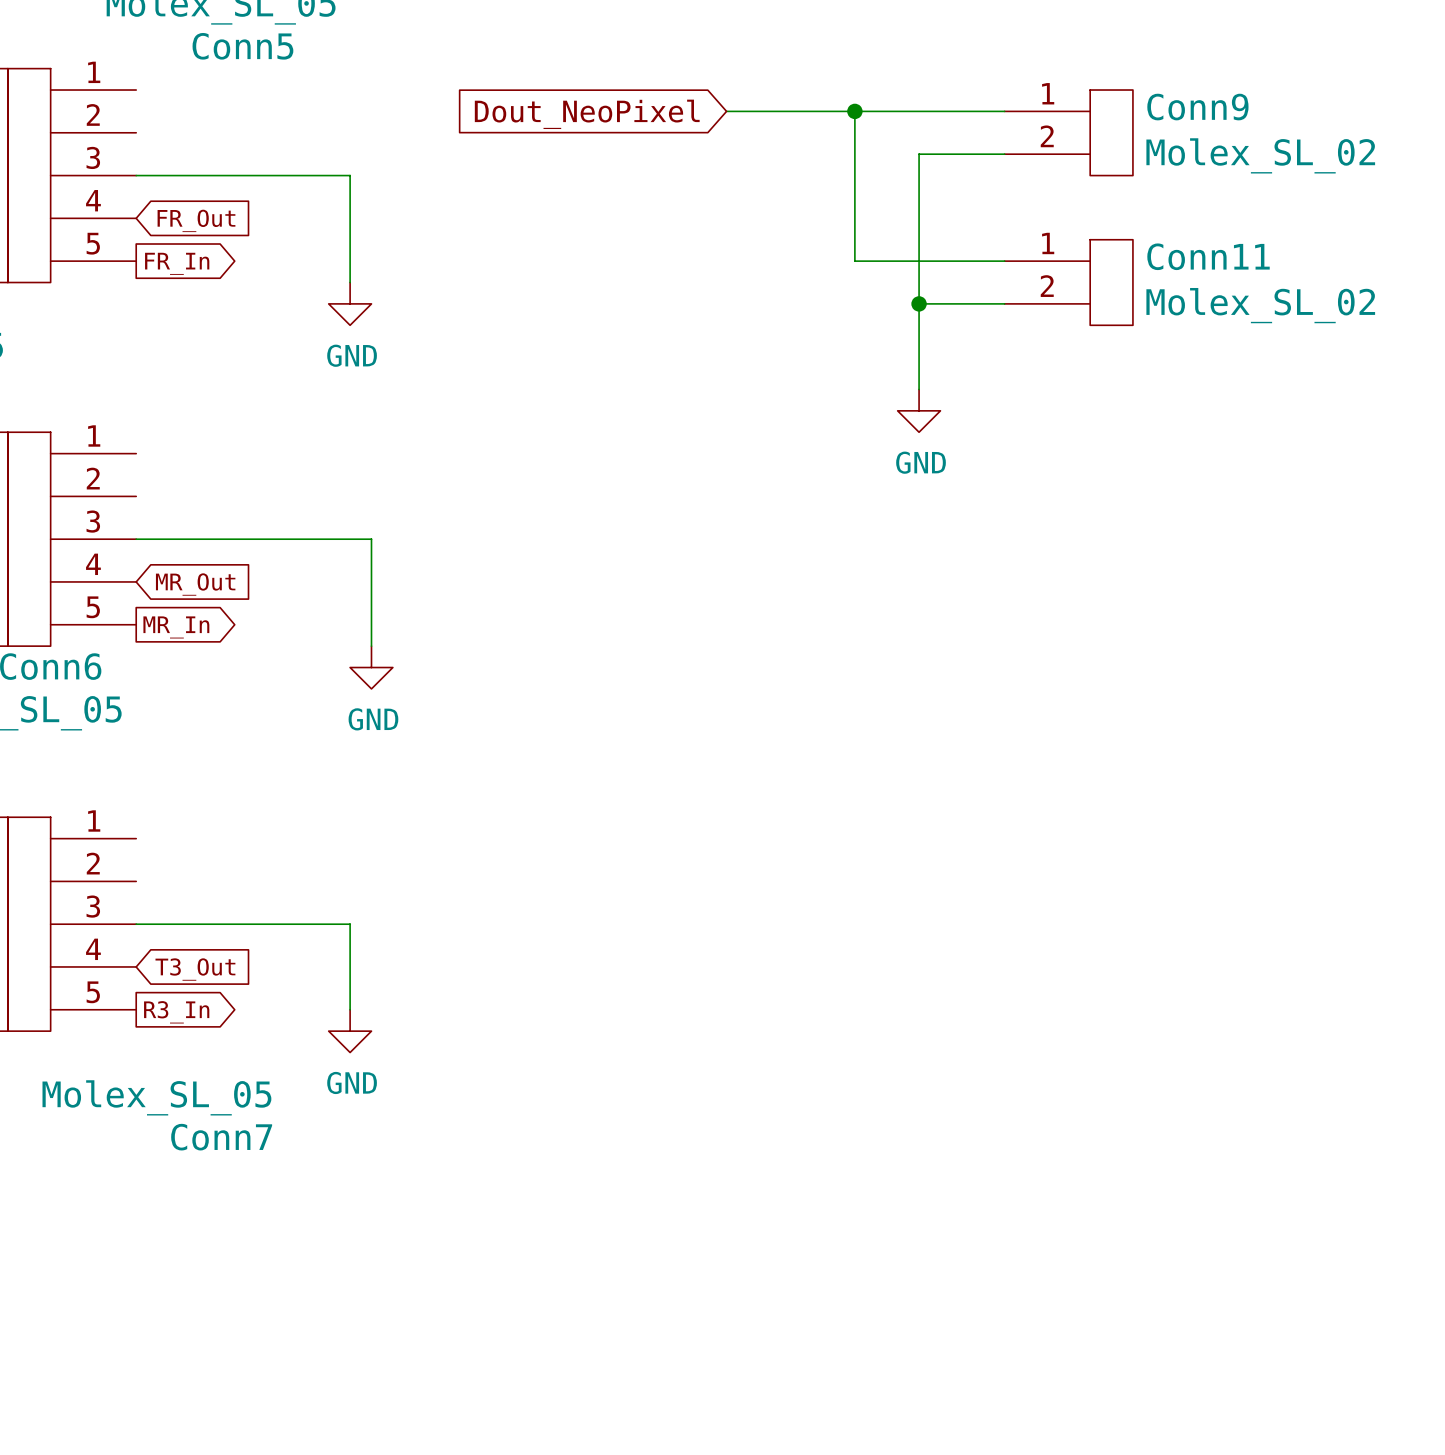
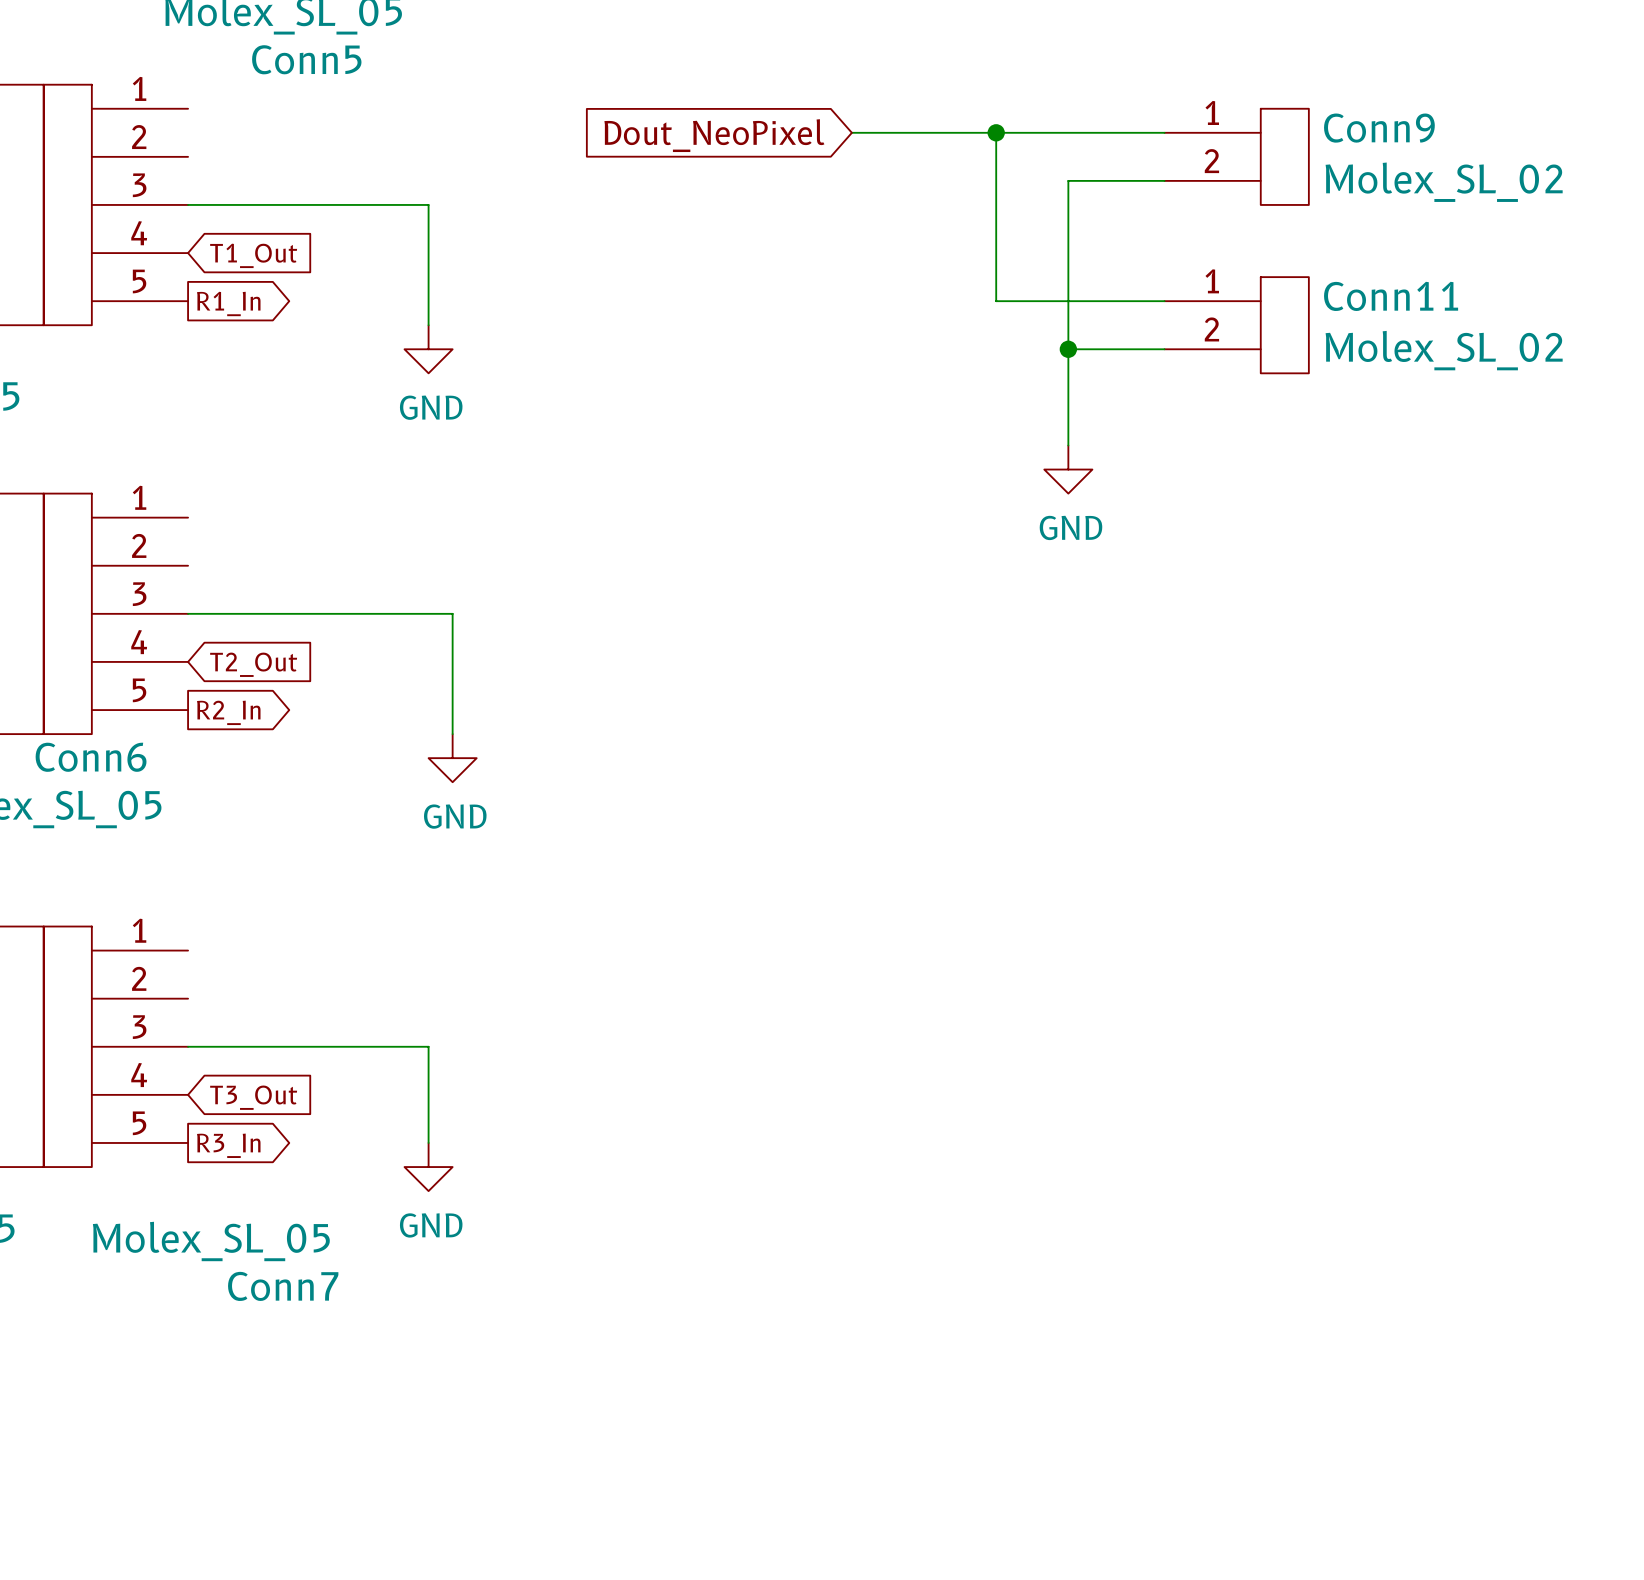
global label: FR_Out (196, 220) -> T1_Out (253, 255)
global label: FR_In (177, 263) -> R1_In (228, 303)
global label: MR_Out (195, 584) -> T2_Out (253, 664)
global label: MR_In (176, 627) -> R2_In (228, 712)

